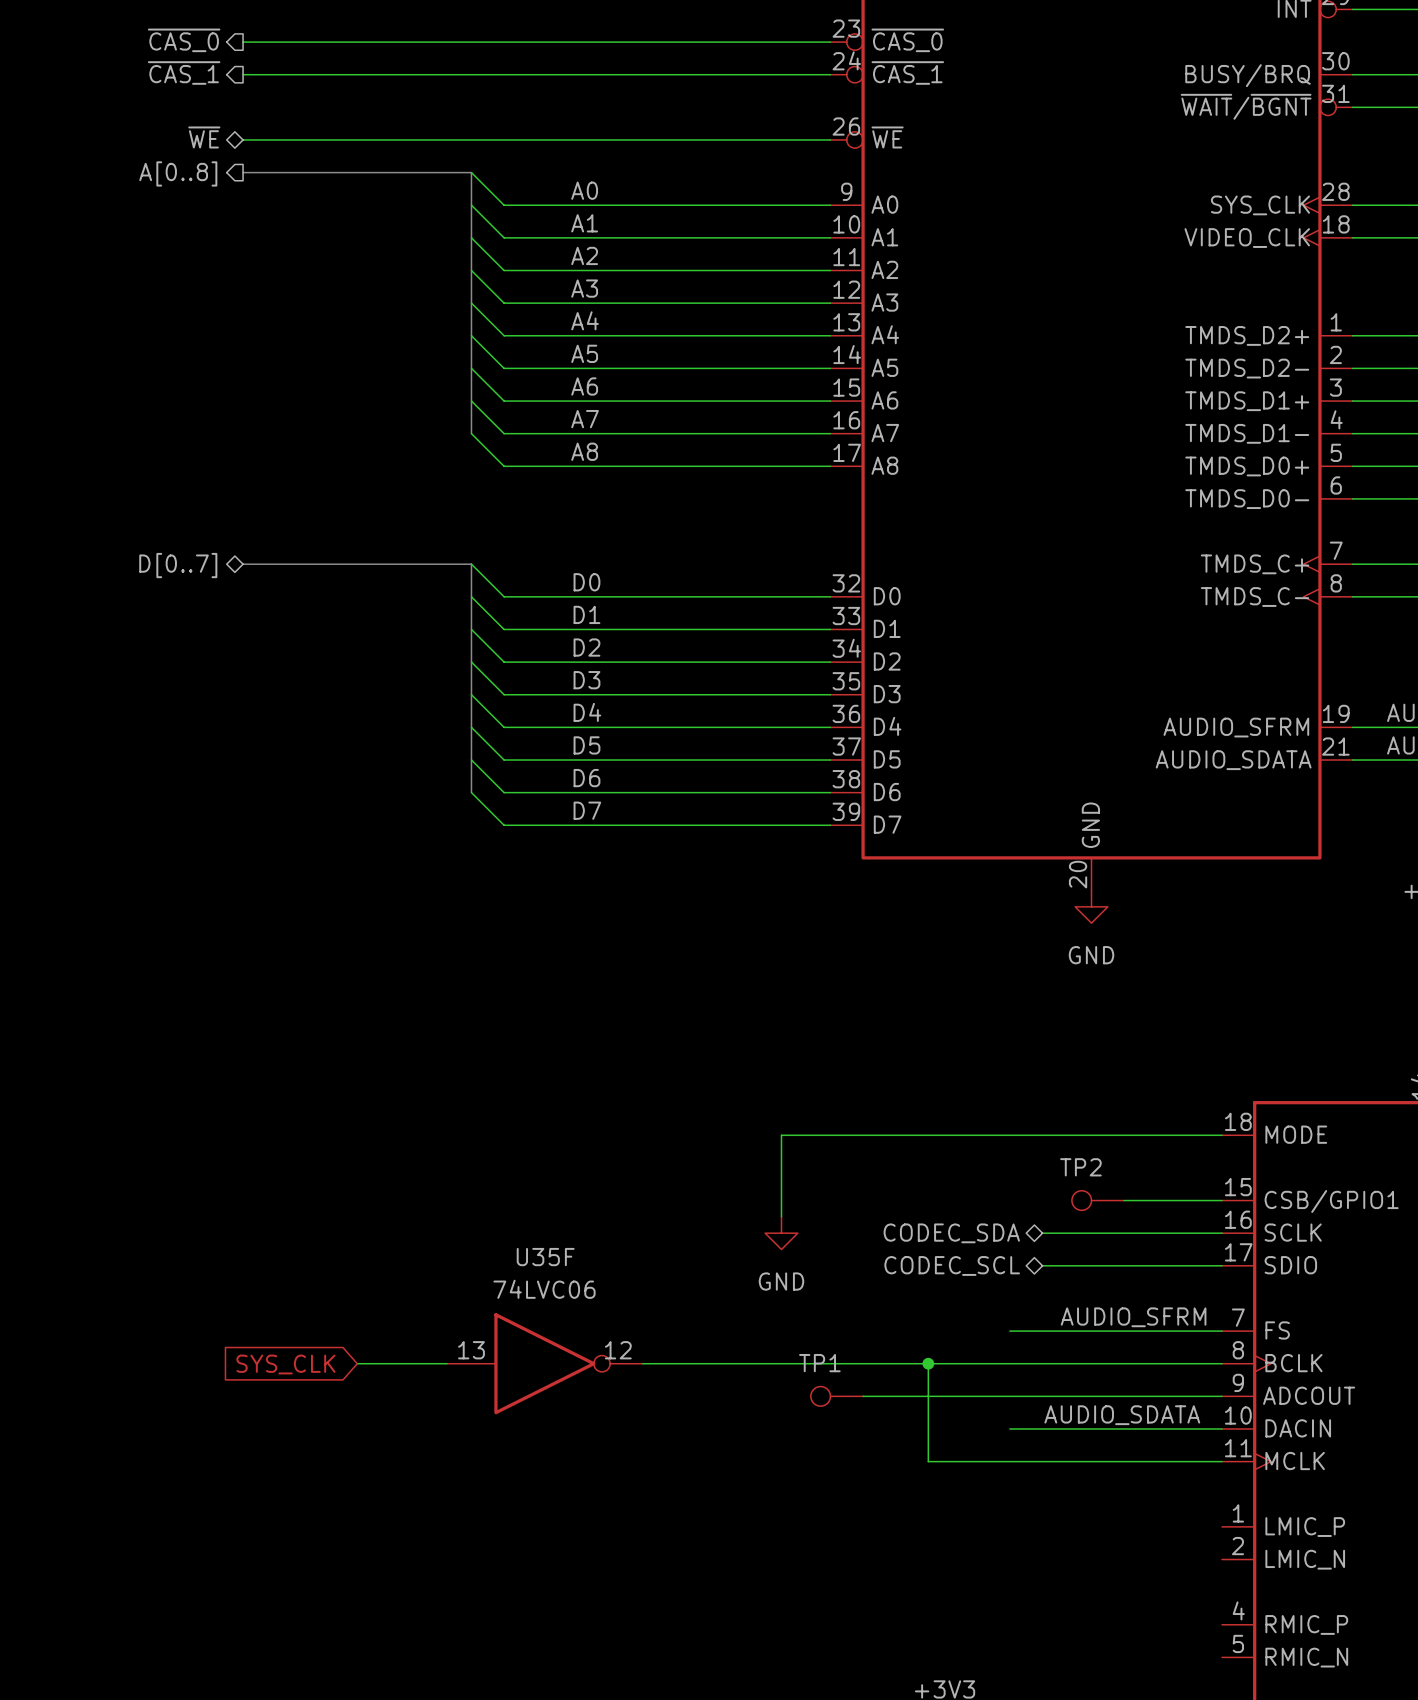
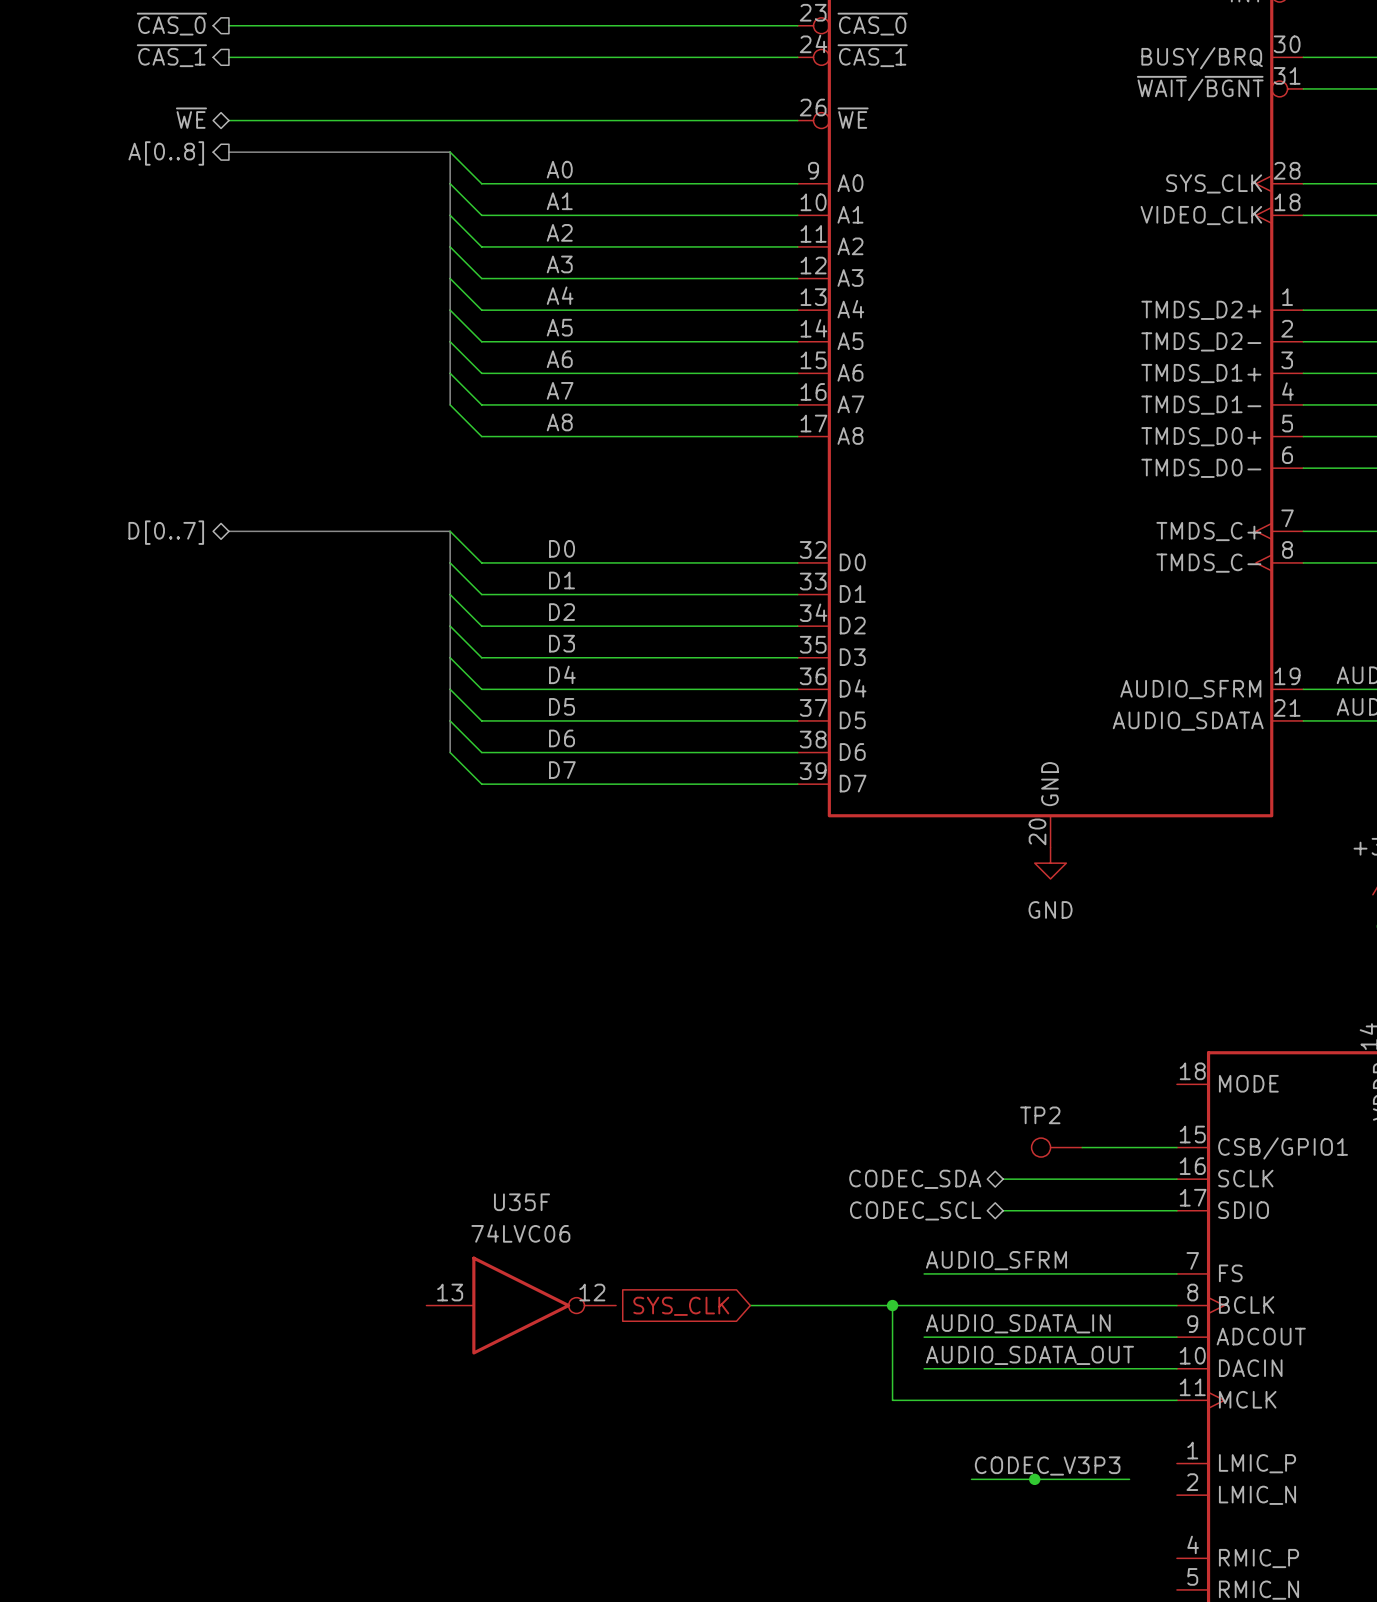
wire: (1222, 1135) (781, 1135) (781, 1216) -> none
power symbol: GND (781, 1233) -> none
label position: AUDIO_SFRM (1133, 1317) -> AUDIO_SFRM (996, 1260)
wire: none -> (924, 1273) (971, 1273)
wire: (357, 1363) (447, 1363) -> none
wire: (642, 1363) (781, 1363) -> none
global label: SYS_CLK (285, 1364) -> none
global label: none -> SYS_CLK (681, 1306)
label: none -> AUDIO_SDATA_IN (1018, 1323)
TP1: (836, 1396) -> none
wire: (863, 1396) (960, 1396) -> none
label: none -> AUDIO_SDATA_OUT (1029, 1355)
label: AUDIO_SDATA (1122, 1415) -> none
wire: none -> (924, 1368) (971, 1368)
label: none -> CODEC_V3P3 (1047, 1466)
wire: none -> (971, 1479) (1129, 1479)
junction: none -> (1034, 1479)

